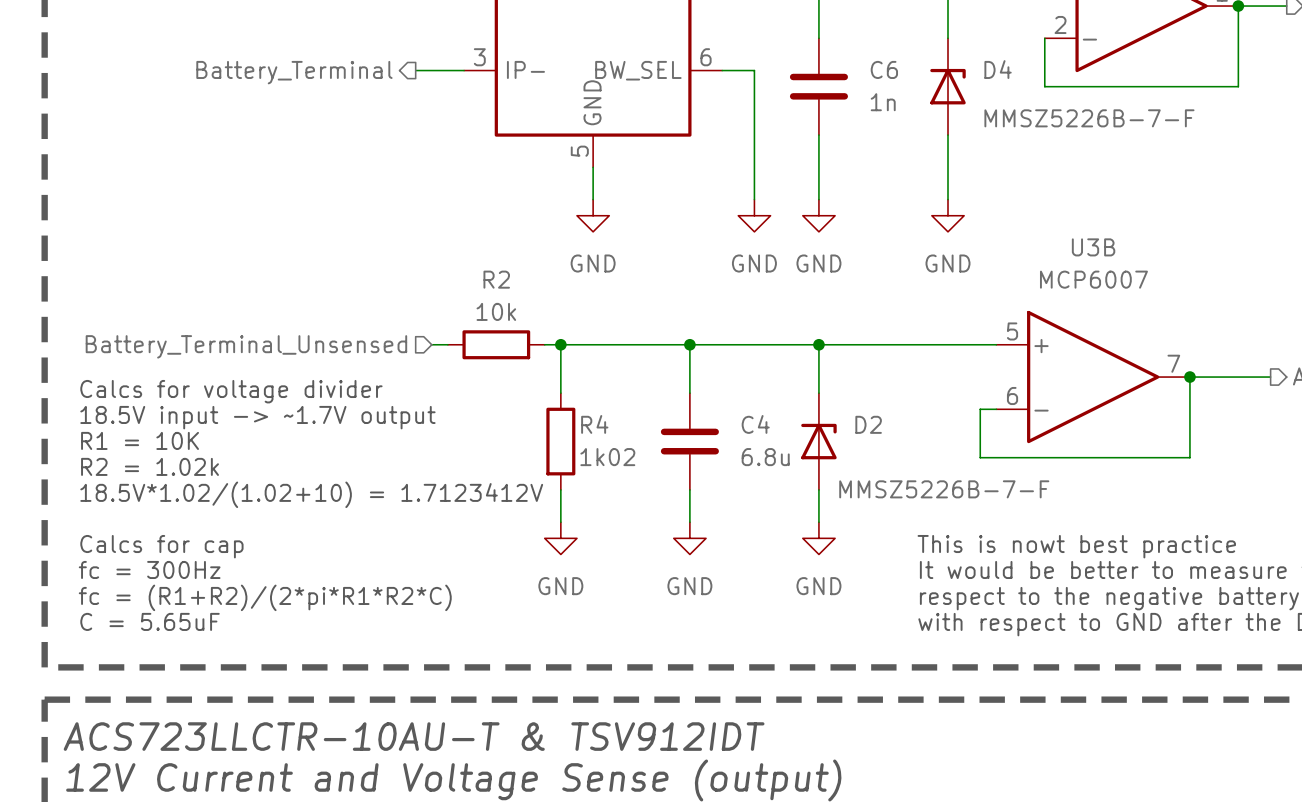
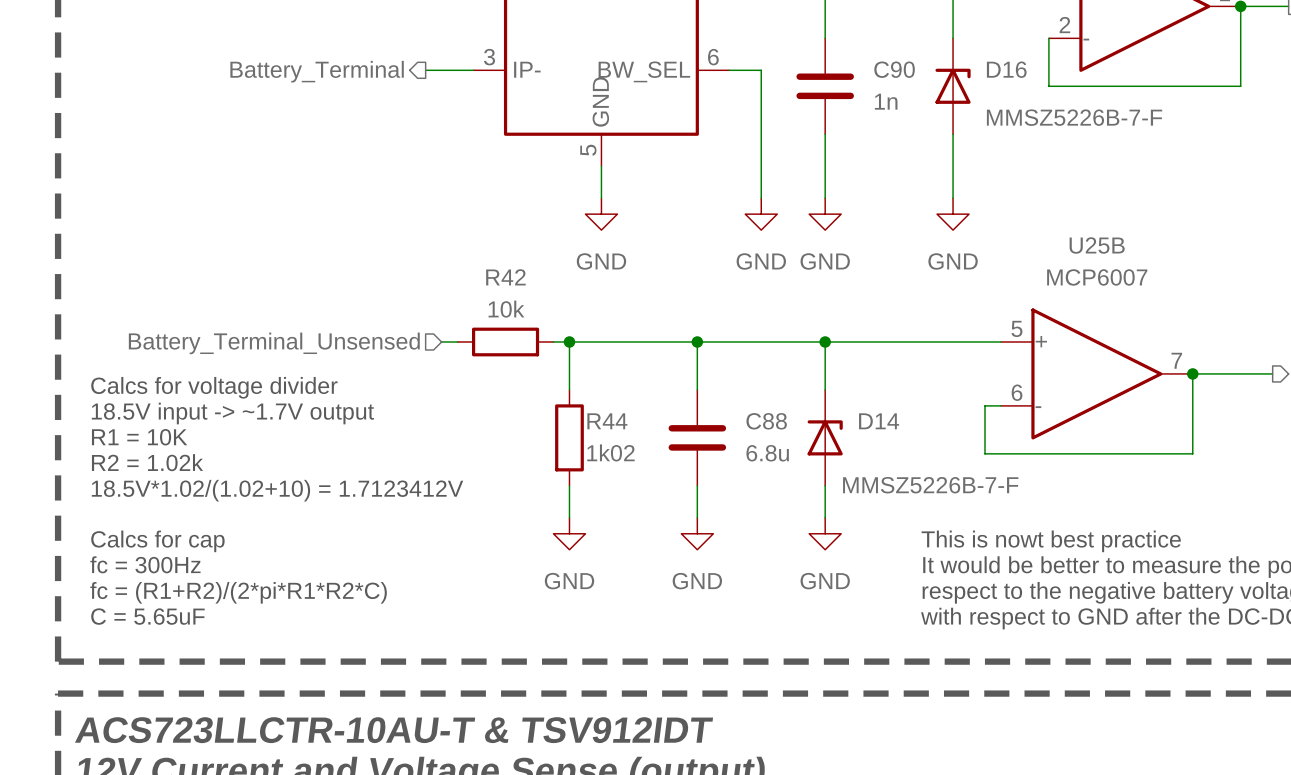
C6 name: C6 (884, 69) -> C90 (894, 69)
D4 name: D4 (998, 69) -> D16 (1006, 69)
U3B name: U3B (1093, 247) -> U25B (1097, 245)
R2 name: R2 (496, 279) -> R42 (505, 277)
R4 name: R4 (594, 424) -> R44 (607, 421)
C4 name: C4 (755, 424) -> C88 (766, 421)
D2 name: D2 (868, 424) -> D14 (879, 421)

